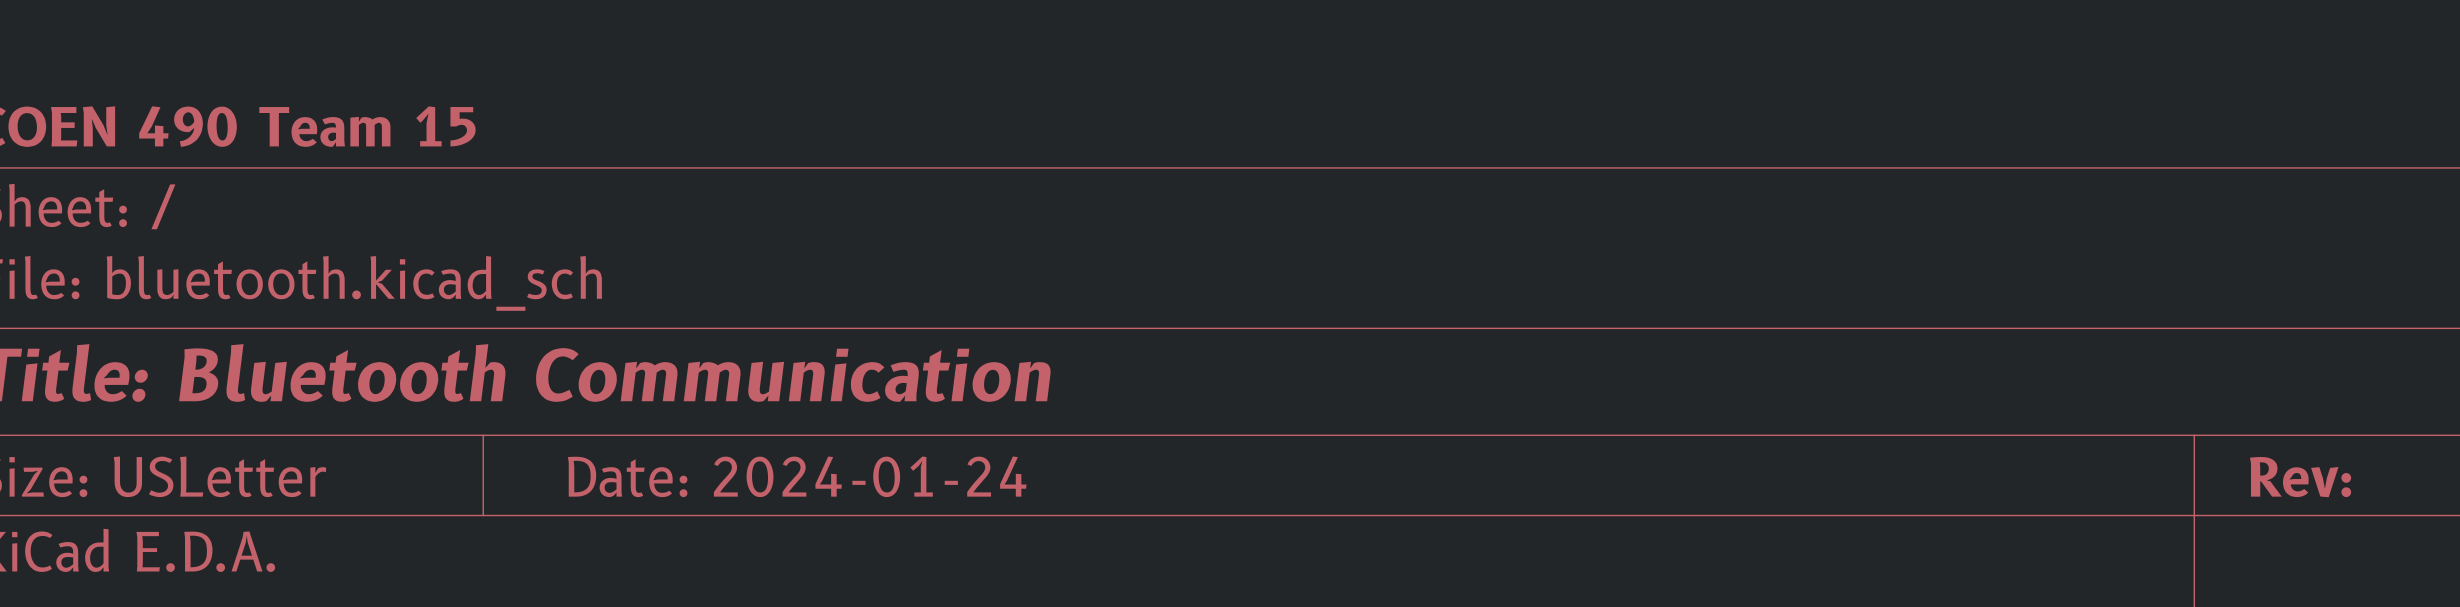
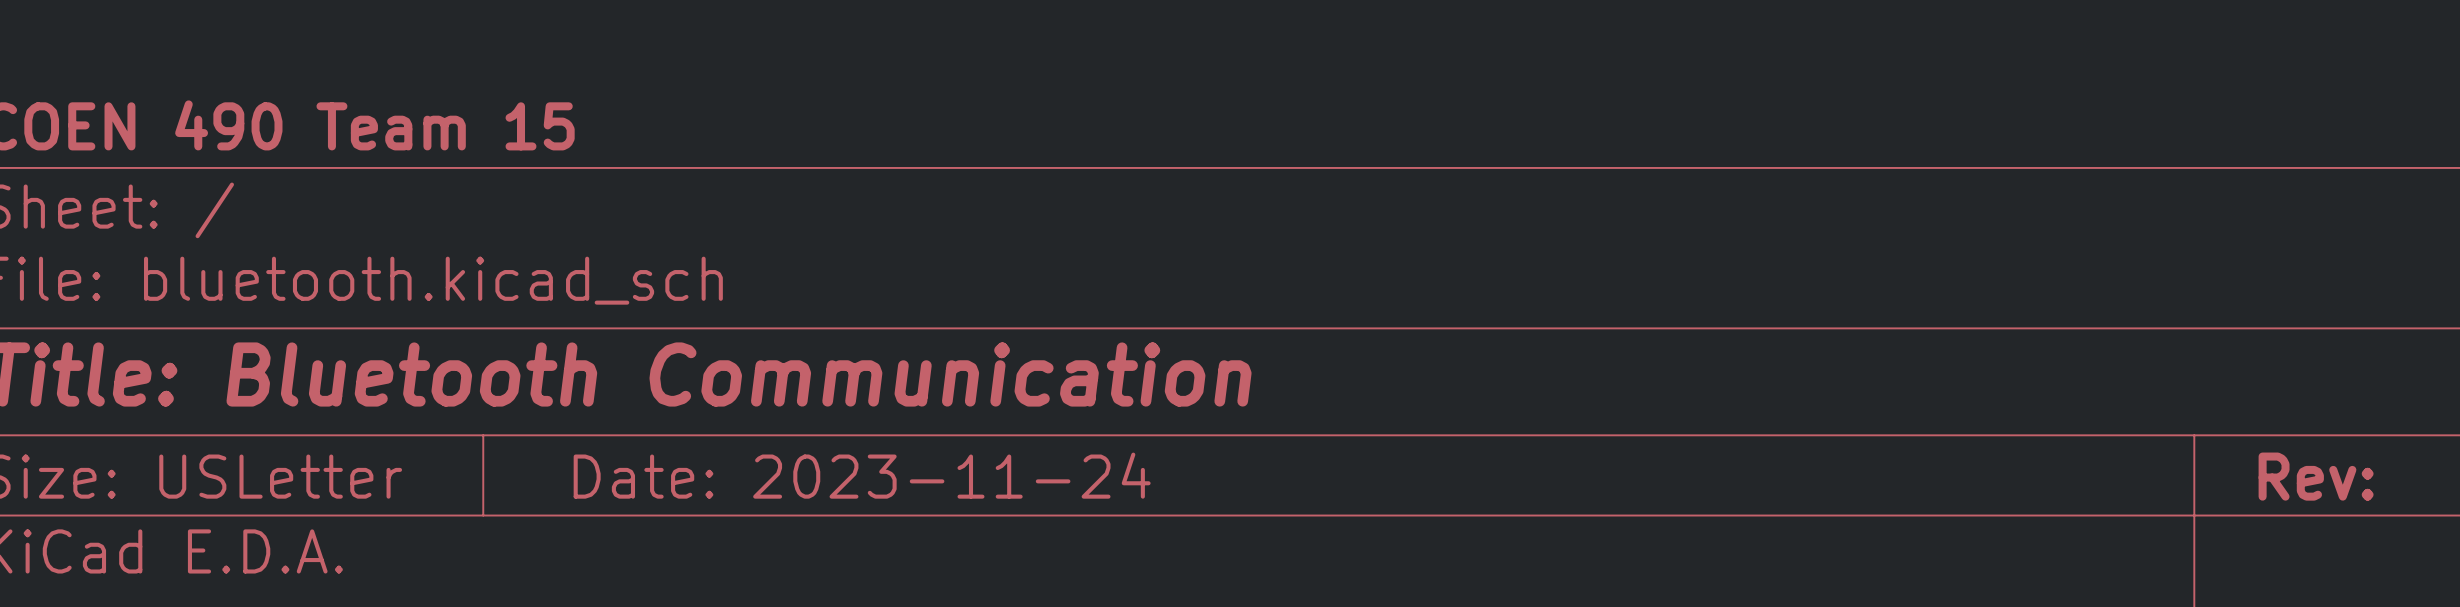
title block: Date: 2024-01-24 (797, 476) -> Date: 2023-11-24 (862, 475)

